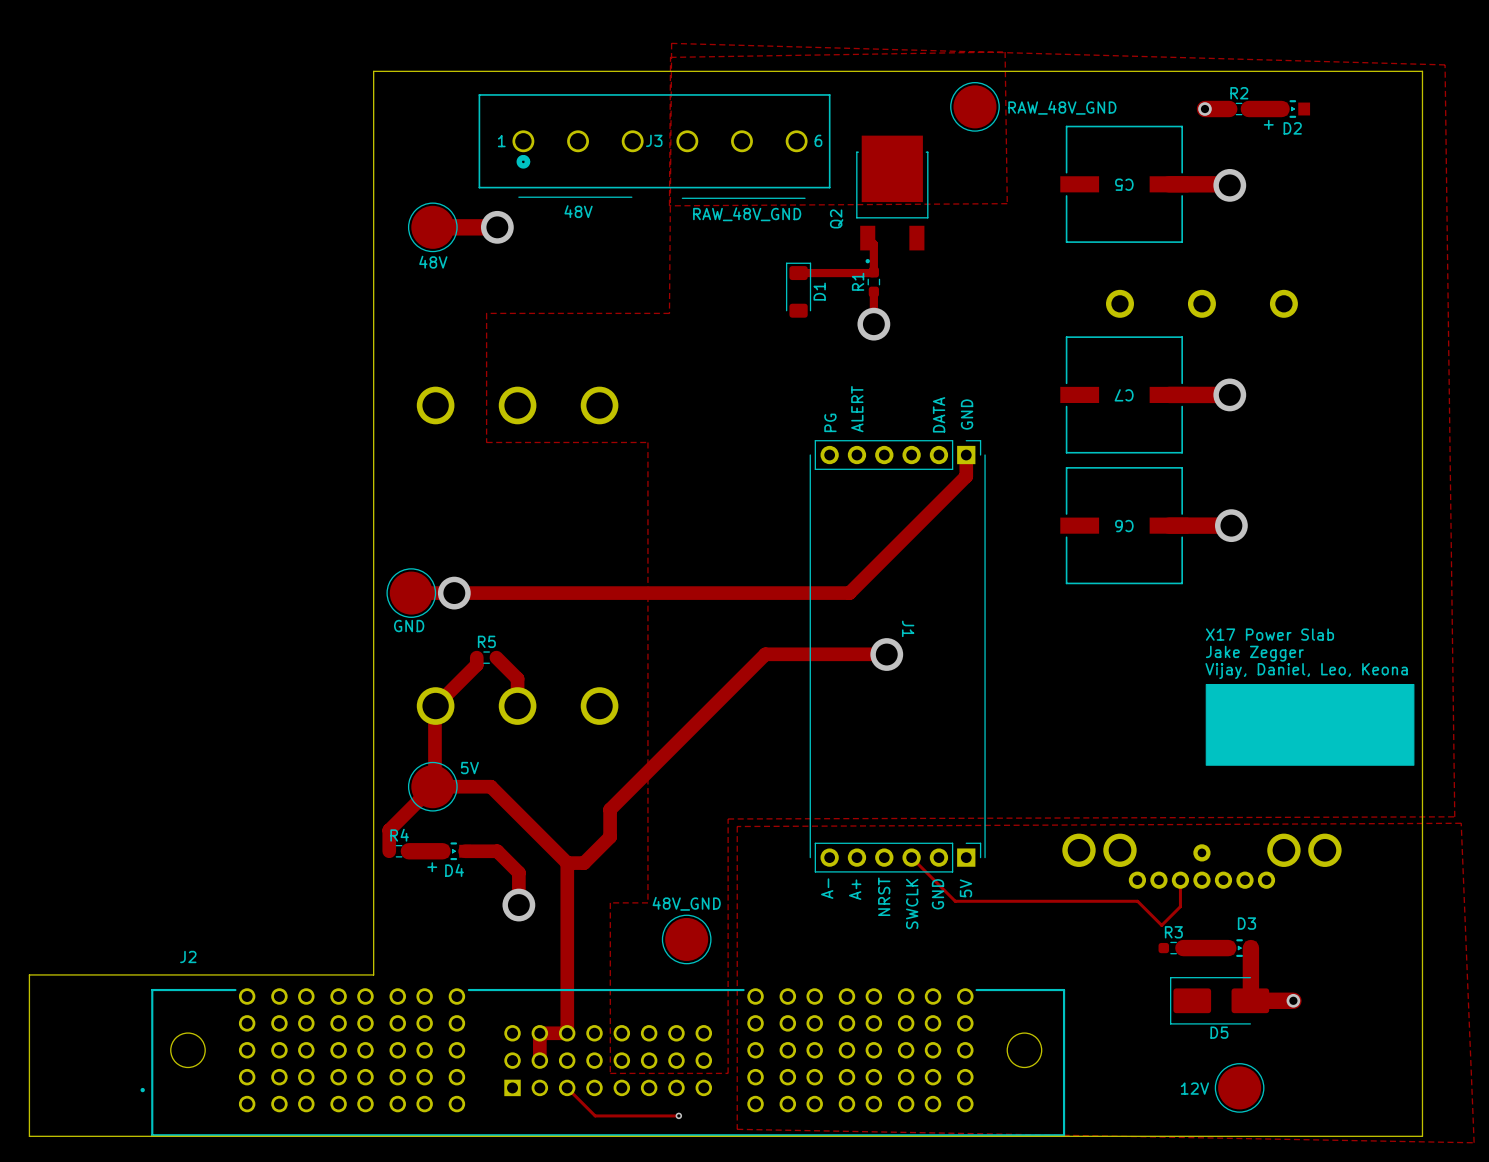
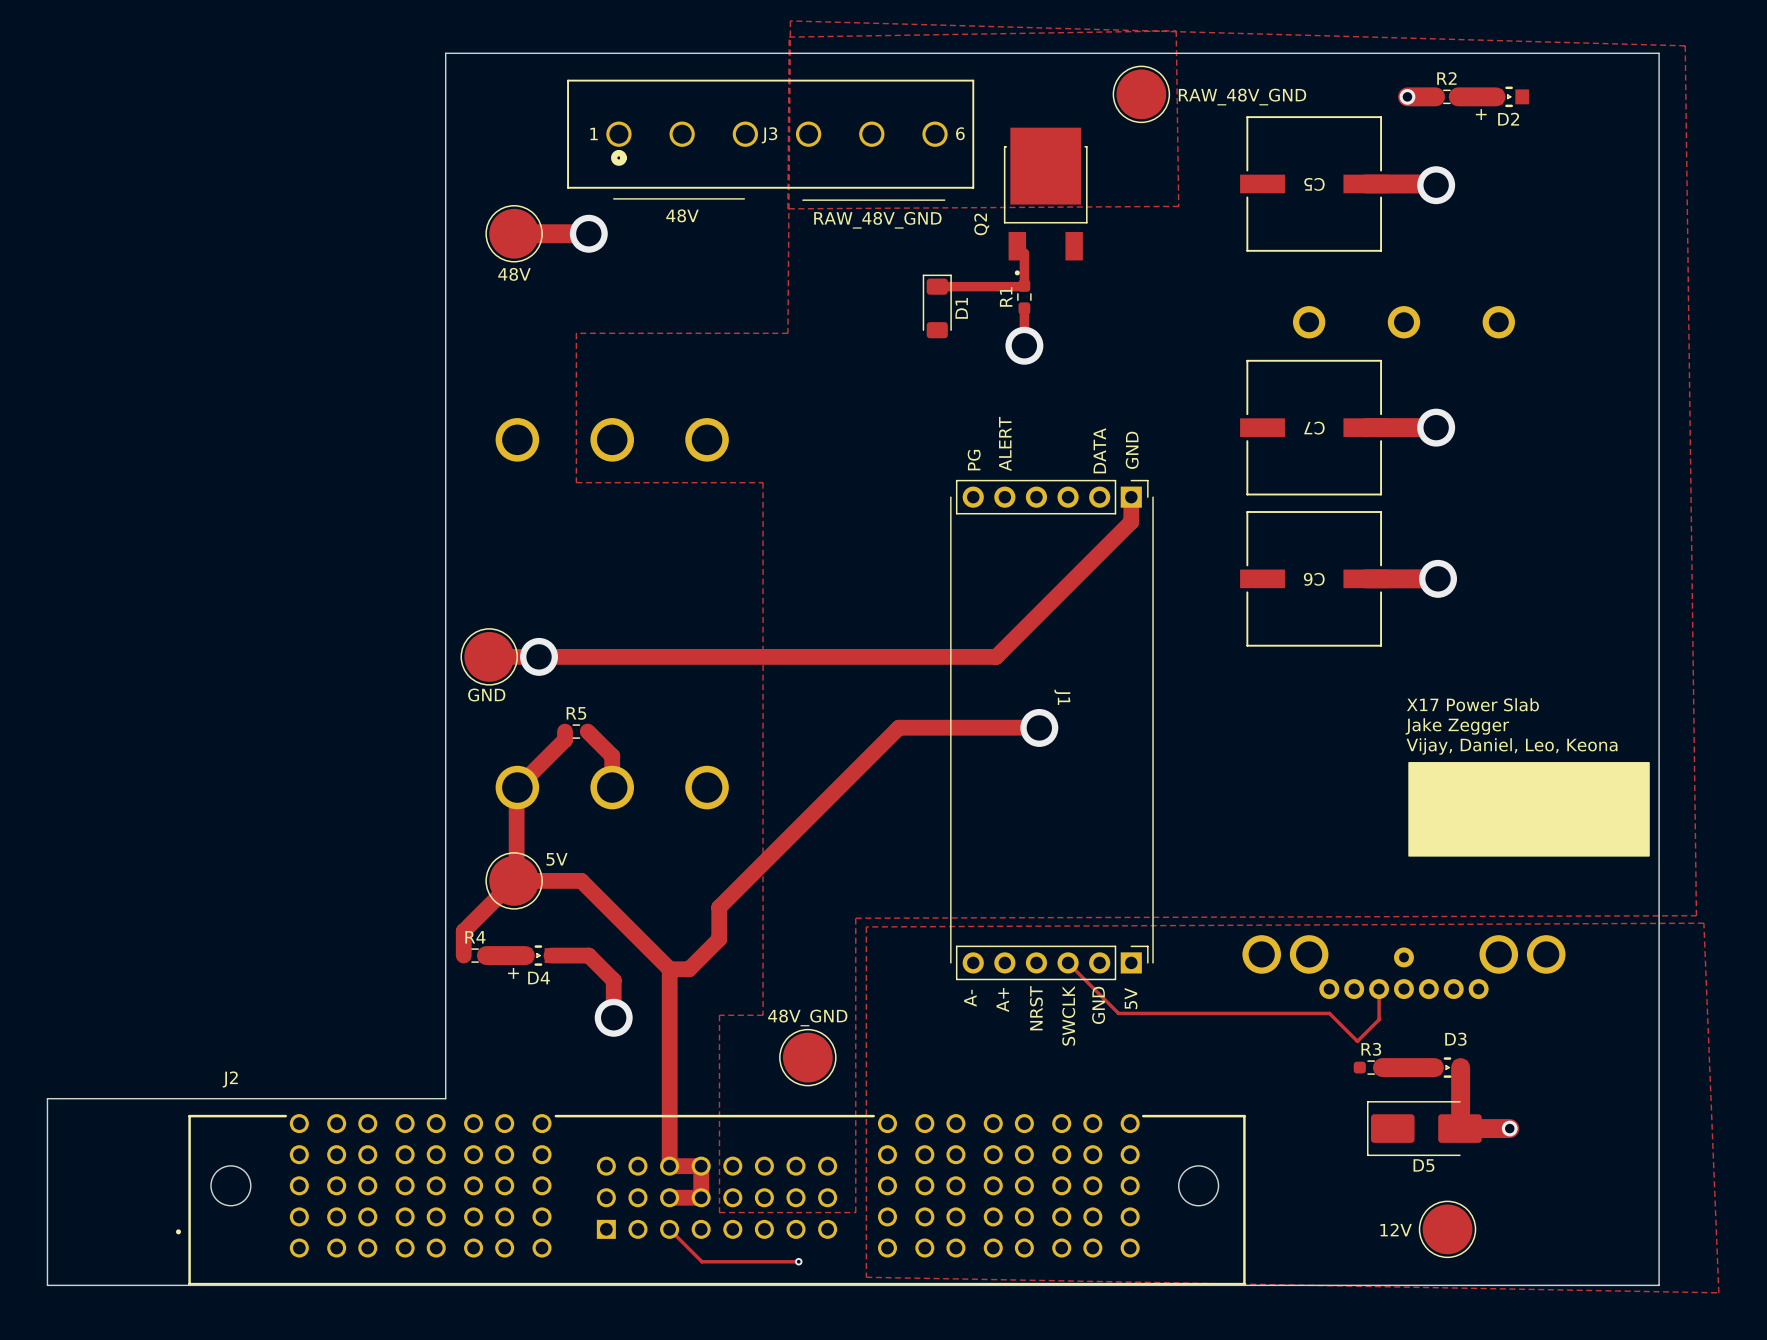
track: (567, 1033) (539, 1033) (539, 1060) -> (669, 1166) (701, 1166) (701, 1197) (669, 1197)

